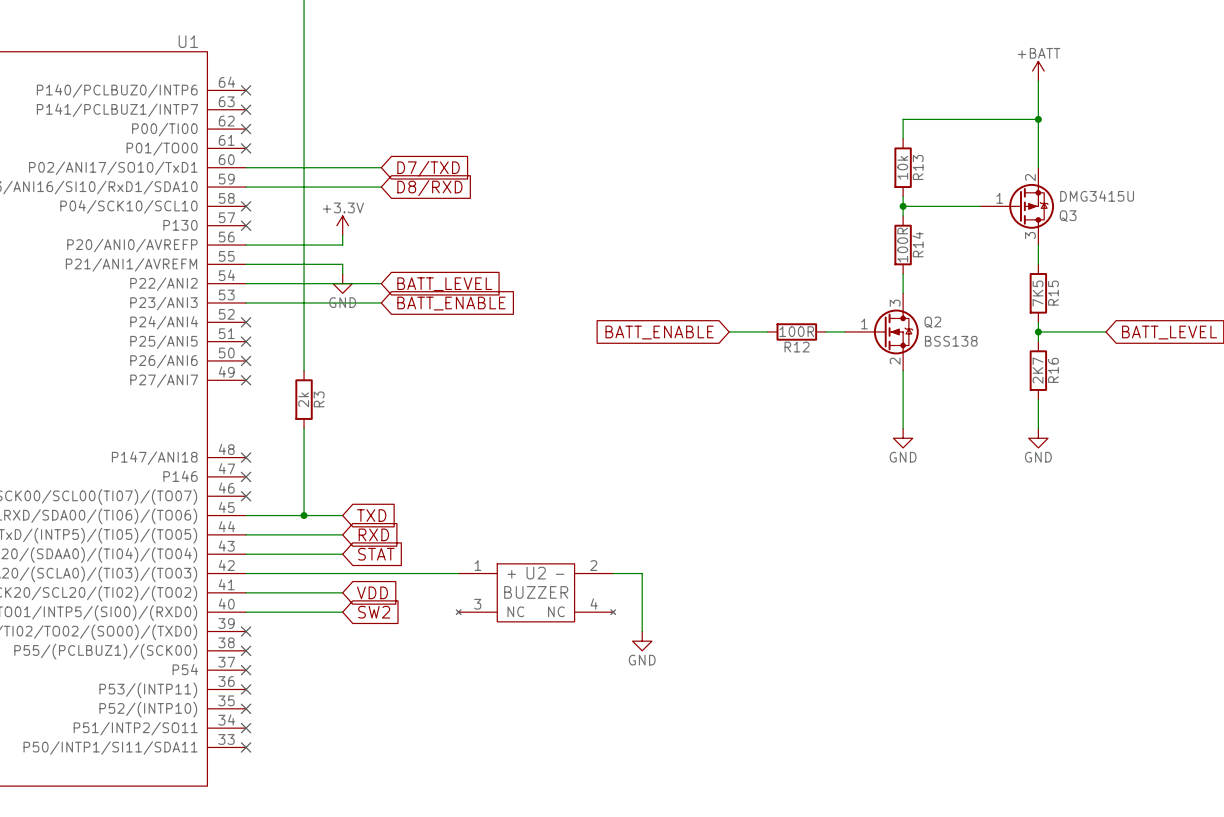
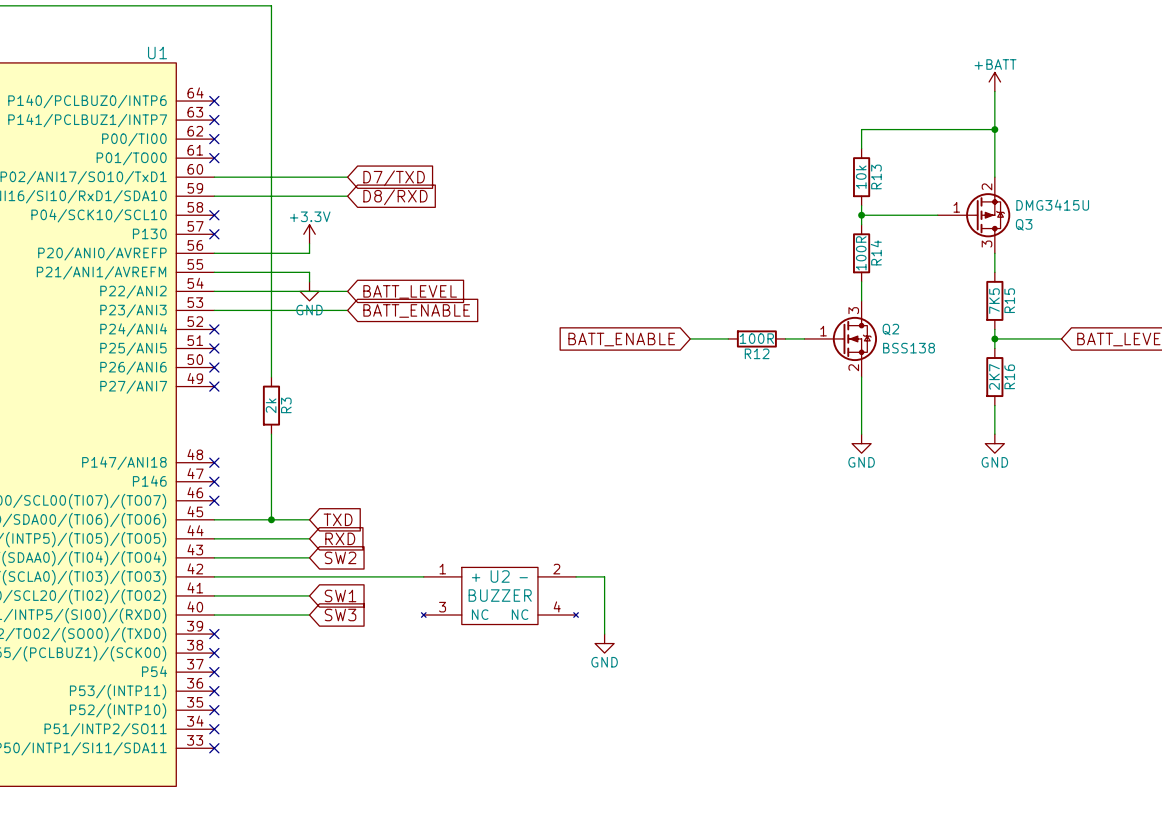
global label: STAT (376, 554) -> SW2 (340, 557)
global label: VDD (372, 592) -> SW1 (340, 595)
global label: SW2 (374, 612) -> SW3 (340, 615)

